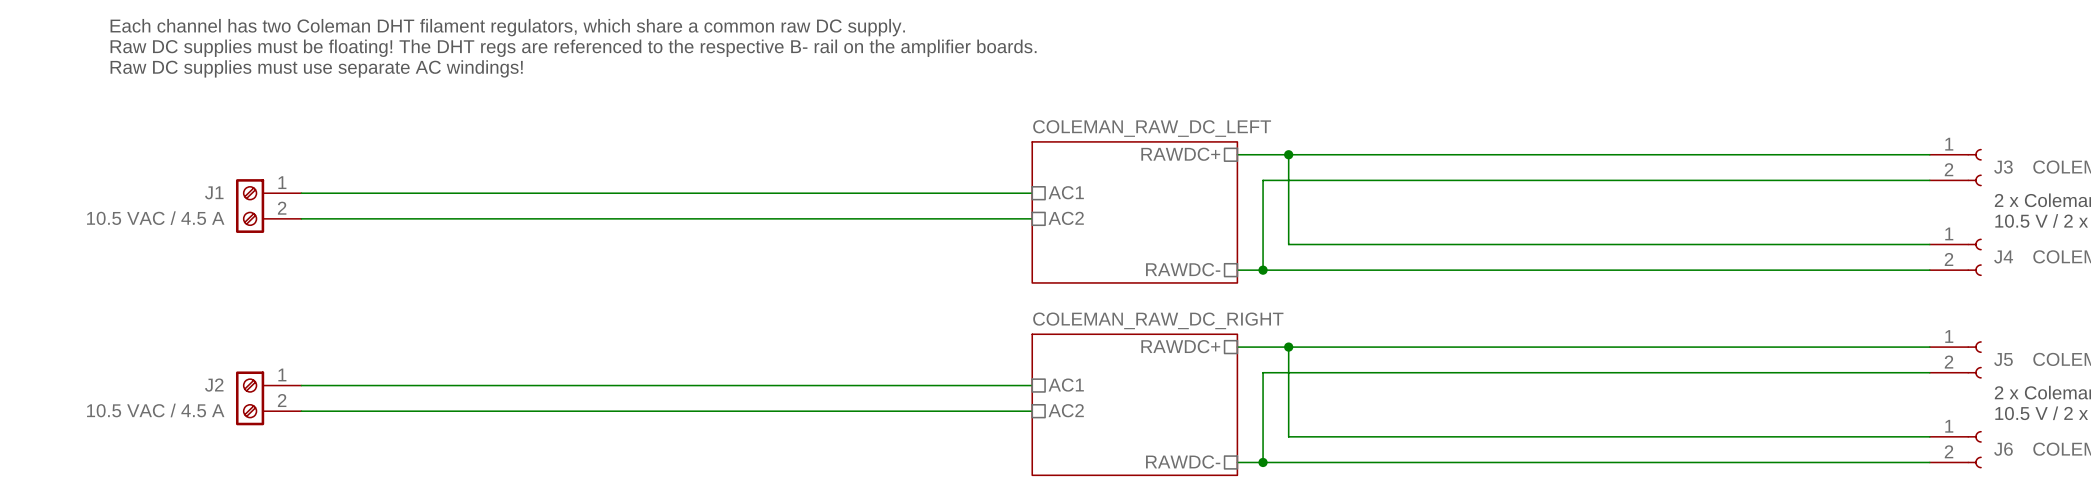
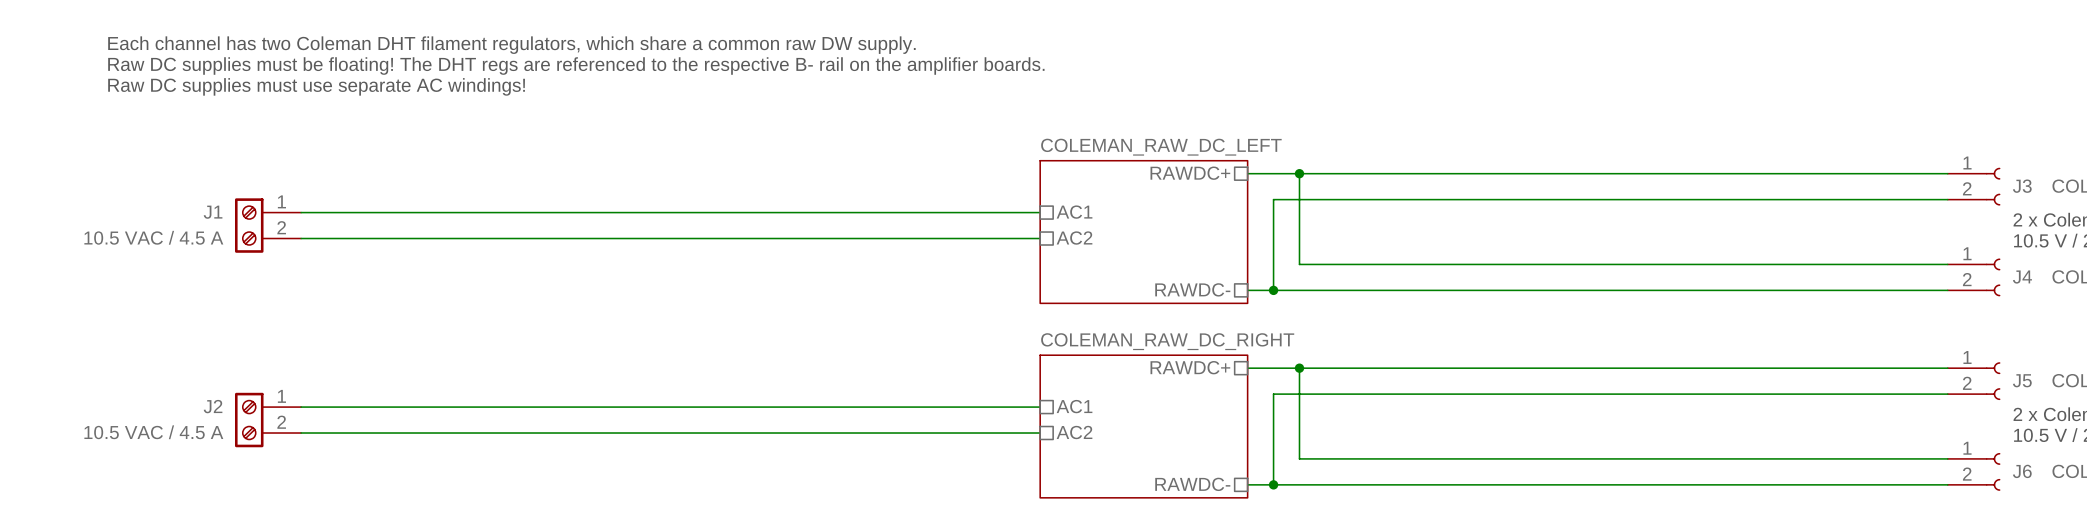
text: Each channel has two Coleman DHT filament regulators, which share a common raw DC supply. (507, 27) -> Each channel has two Coleman DHT filament regulators, which share a common raw DW supply. (511, 45)

